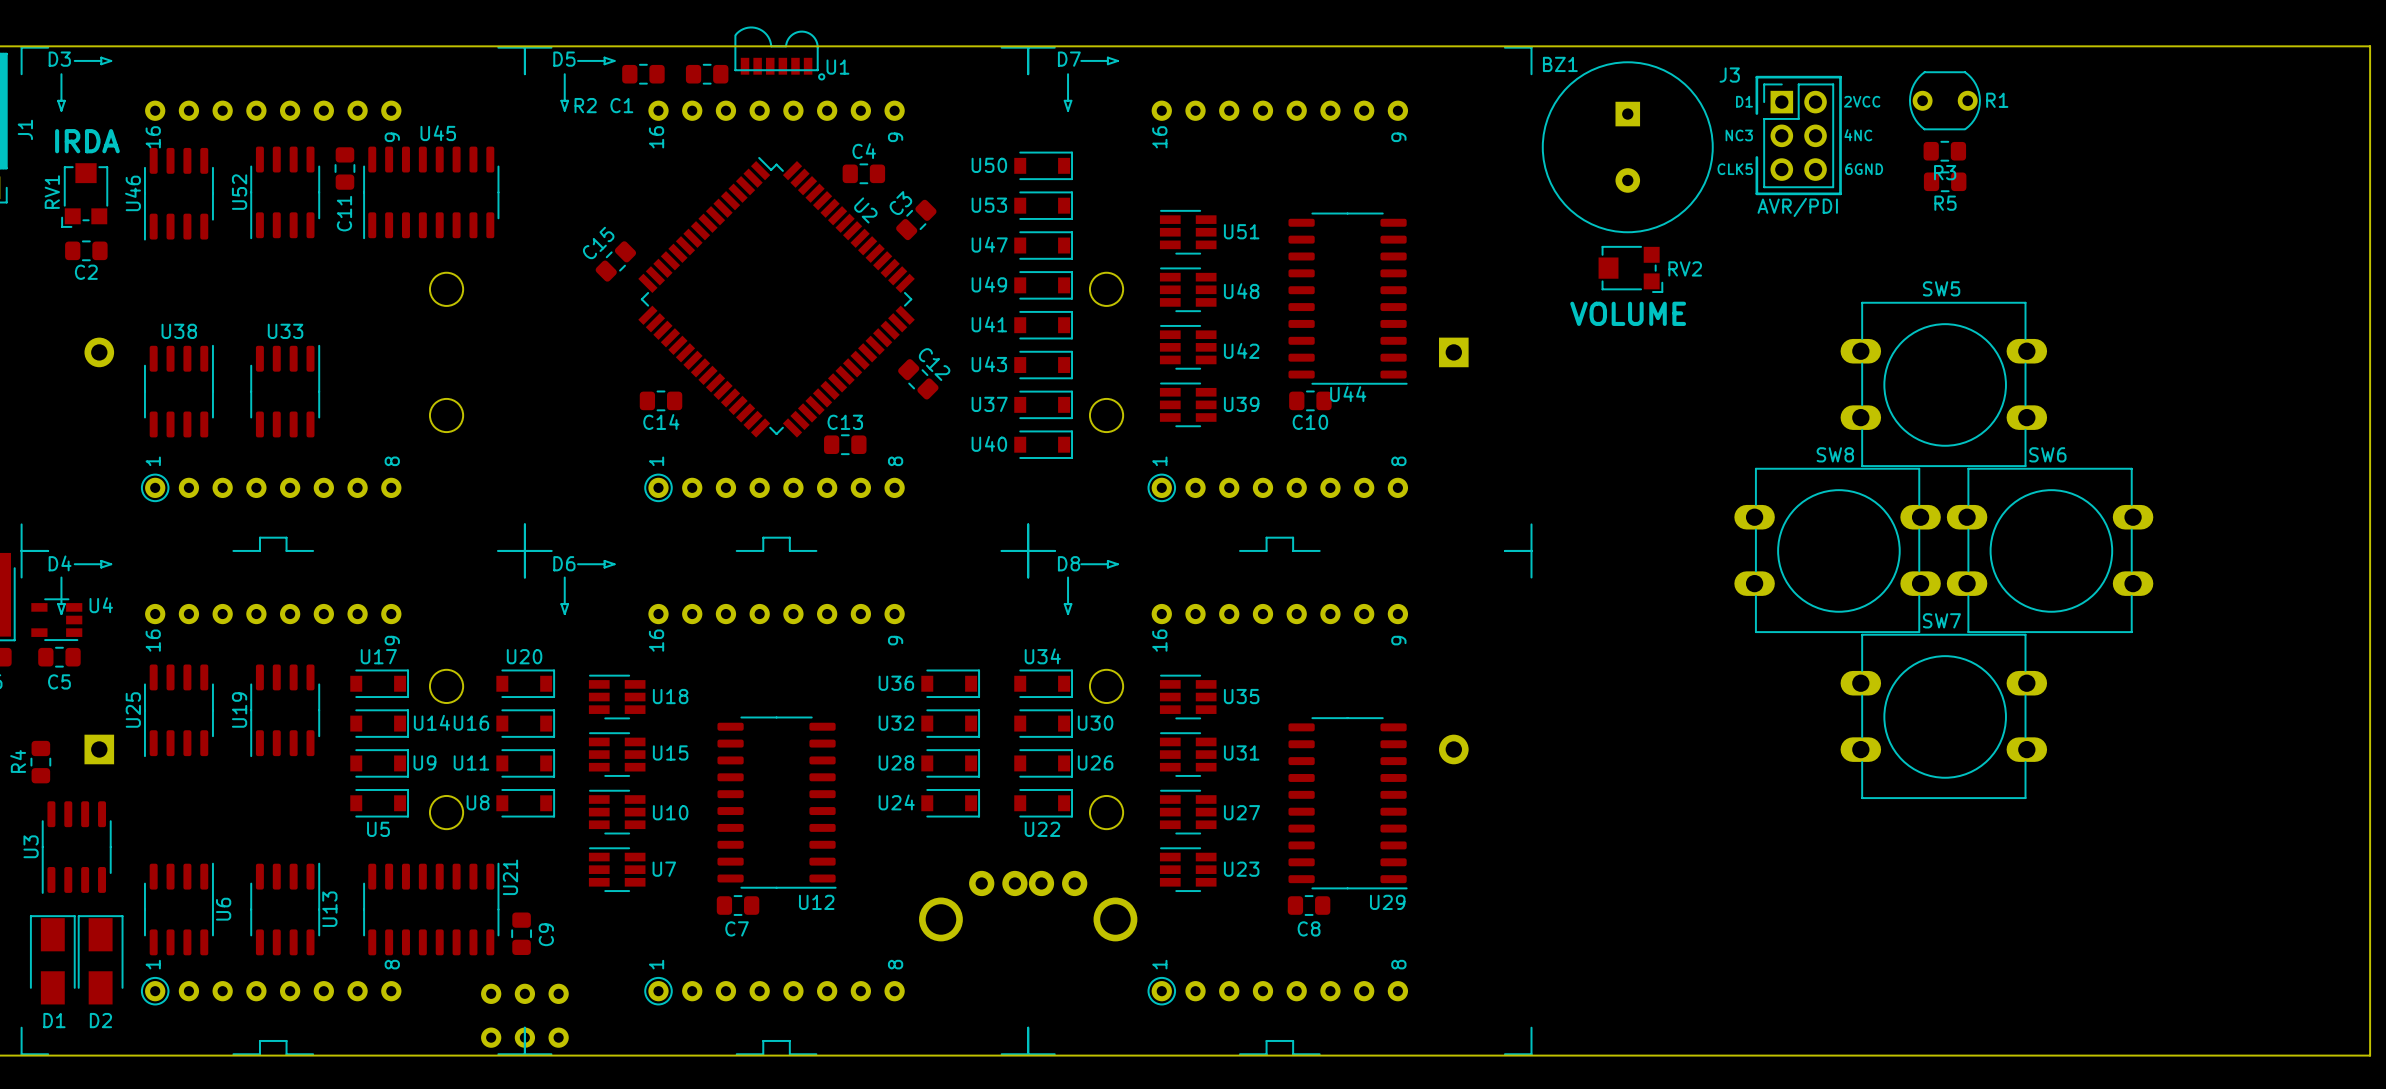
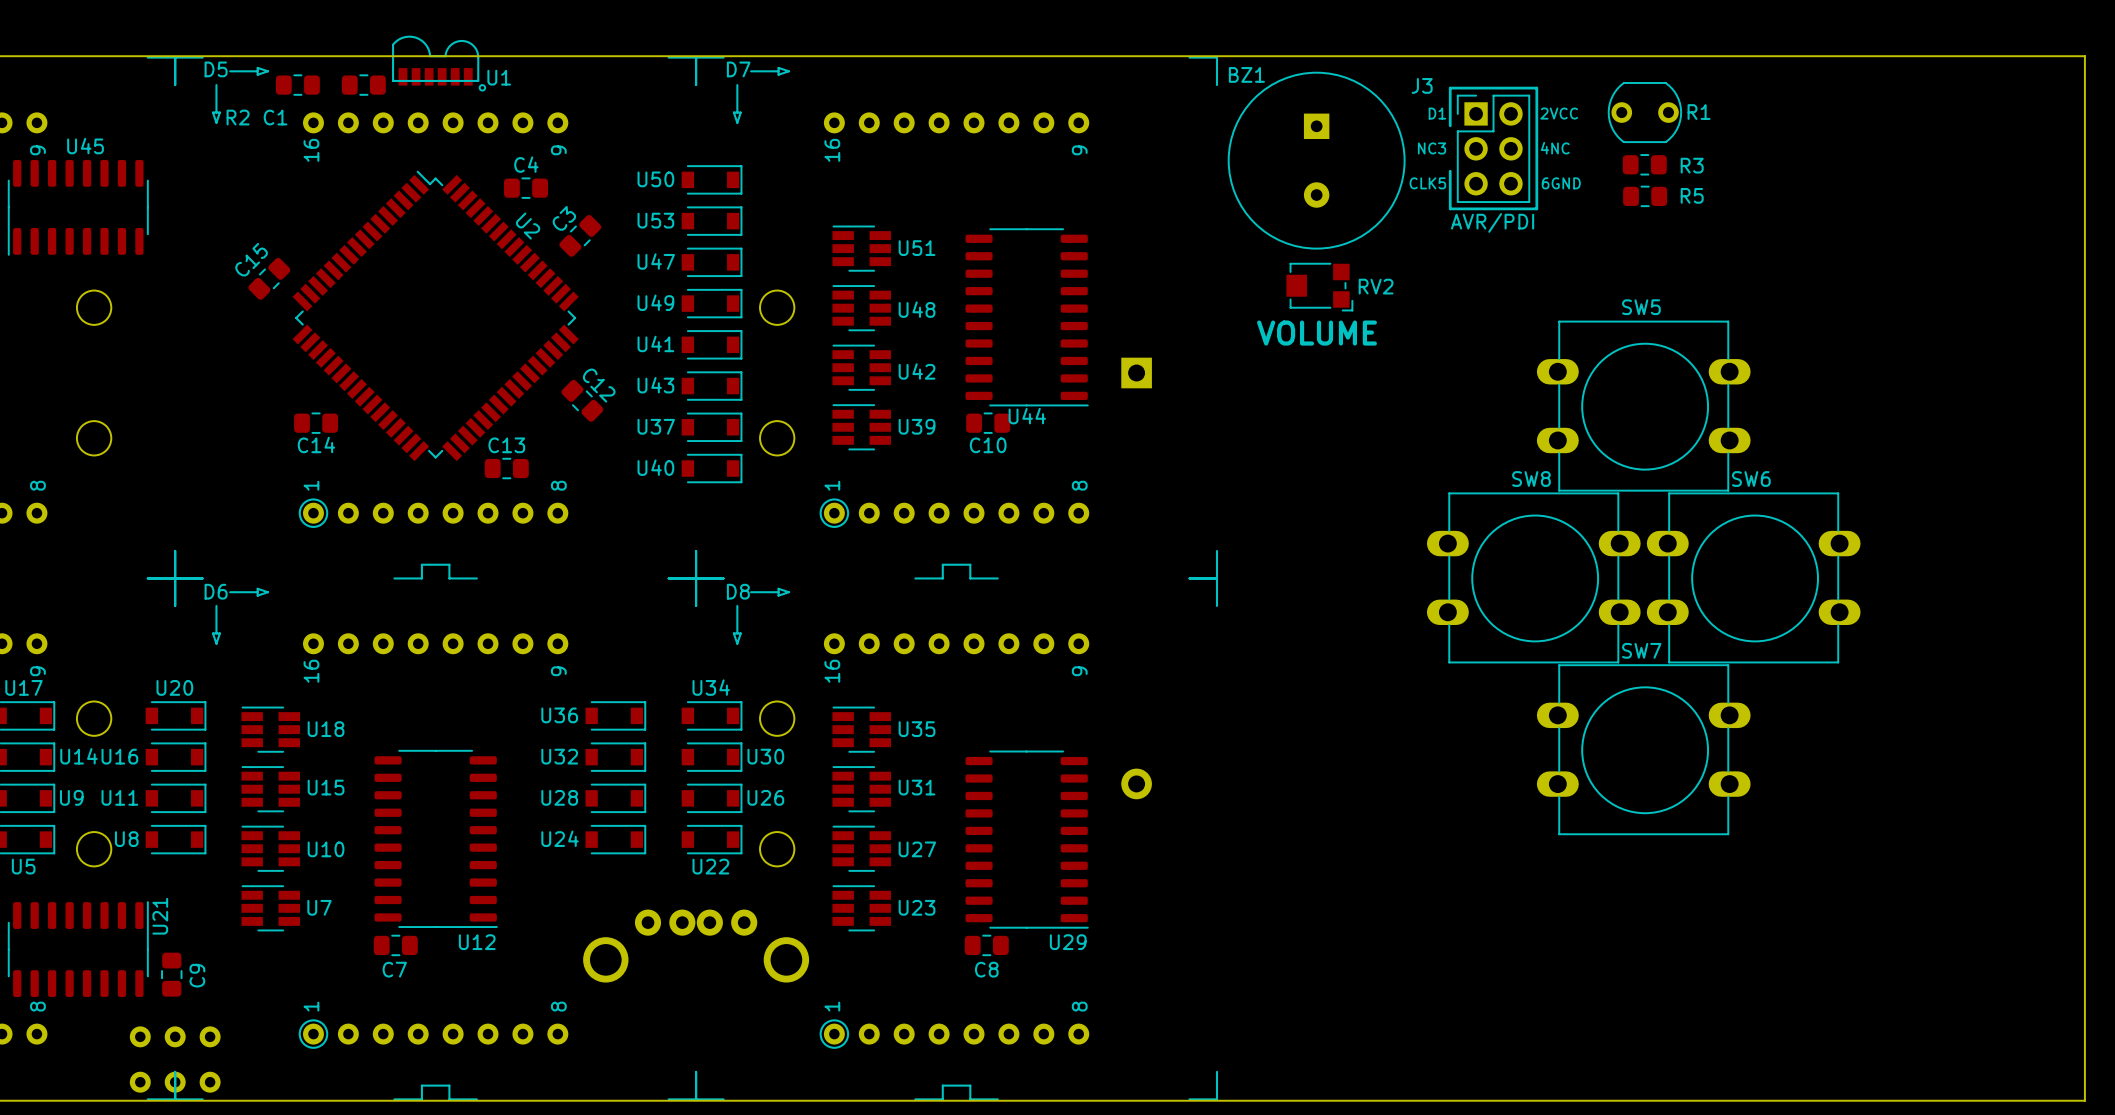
R3 name position: R3 (1945, 172) -> R3 (1692, 165)
R5 name position: R5 (1945, 203) -> R5 (1692, 195)

